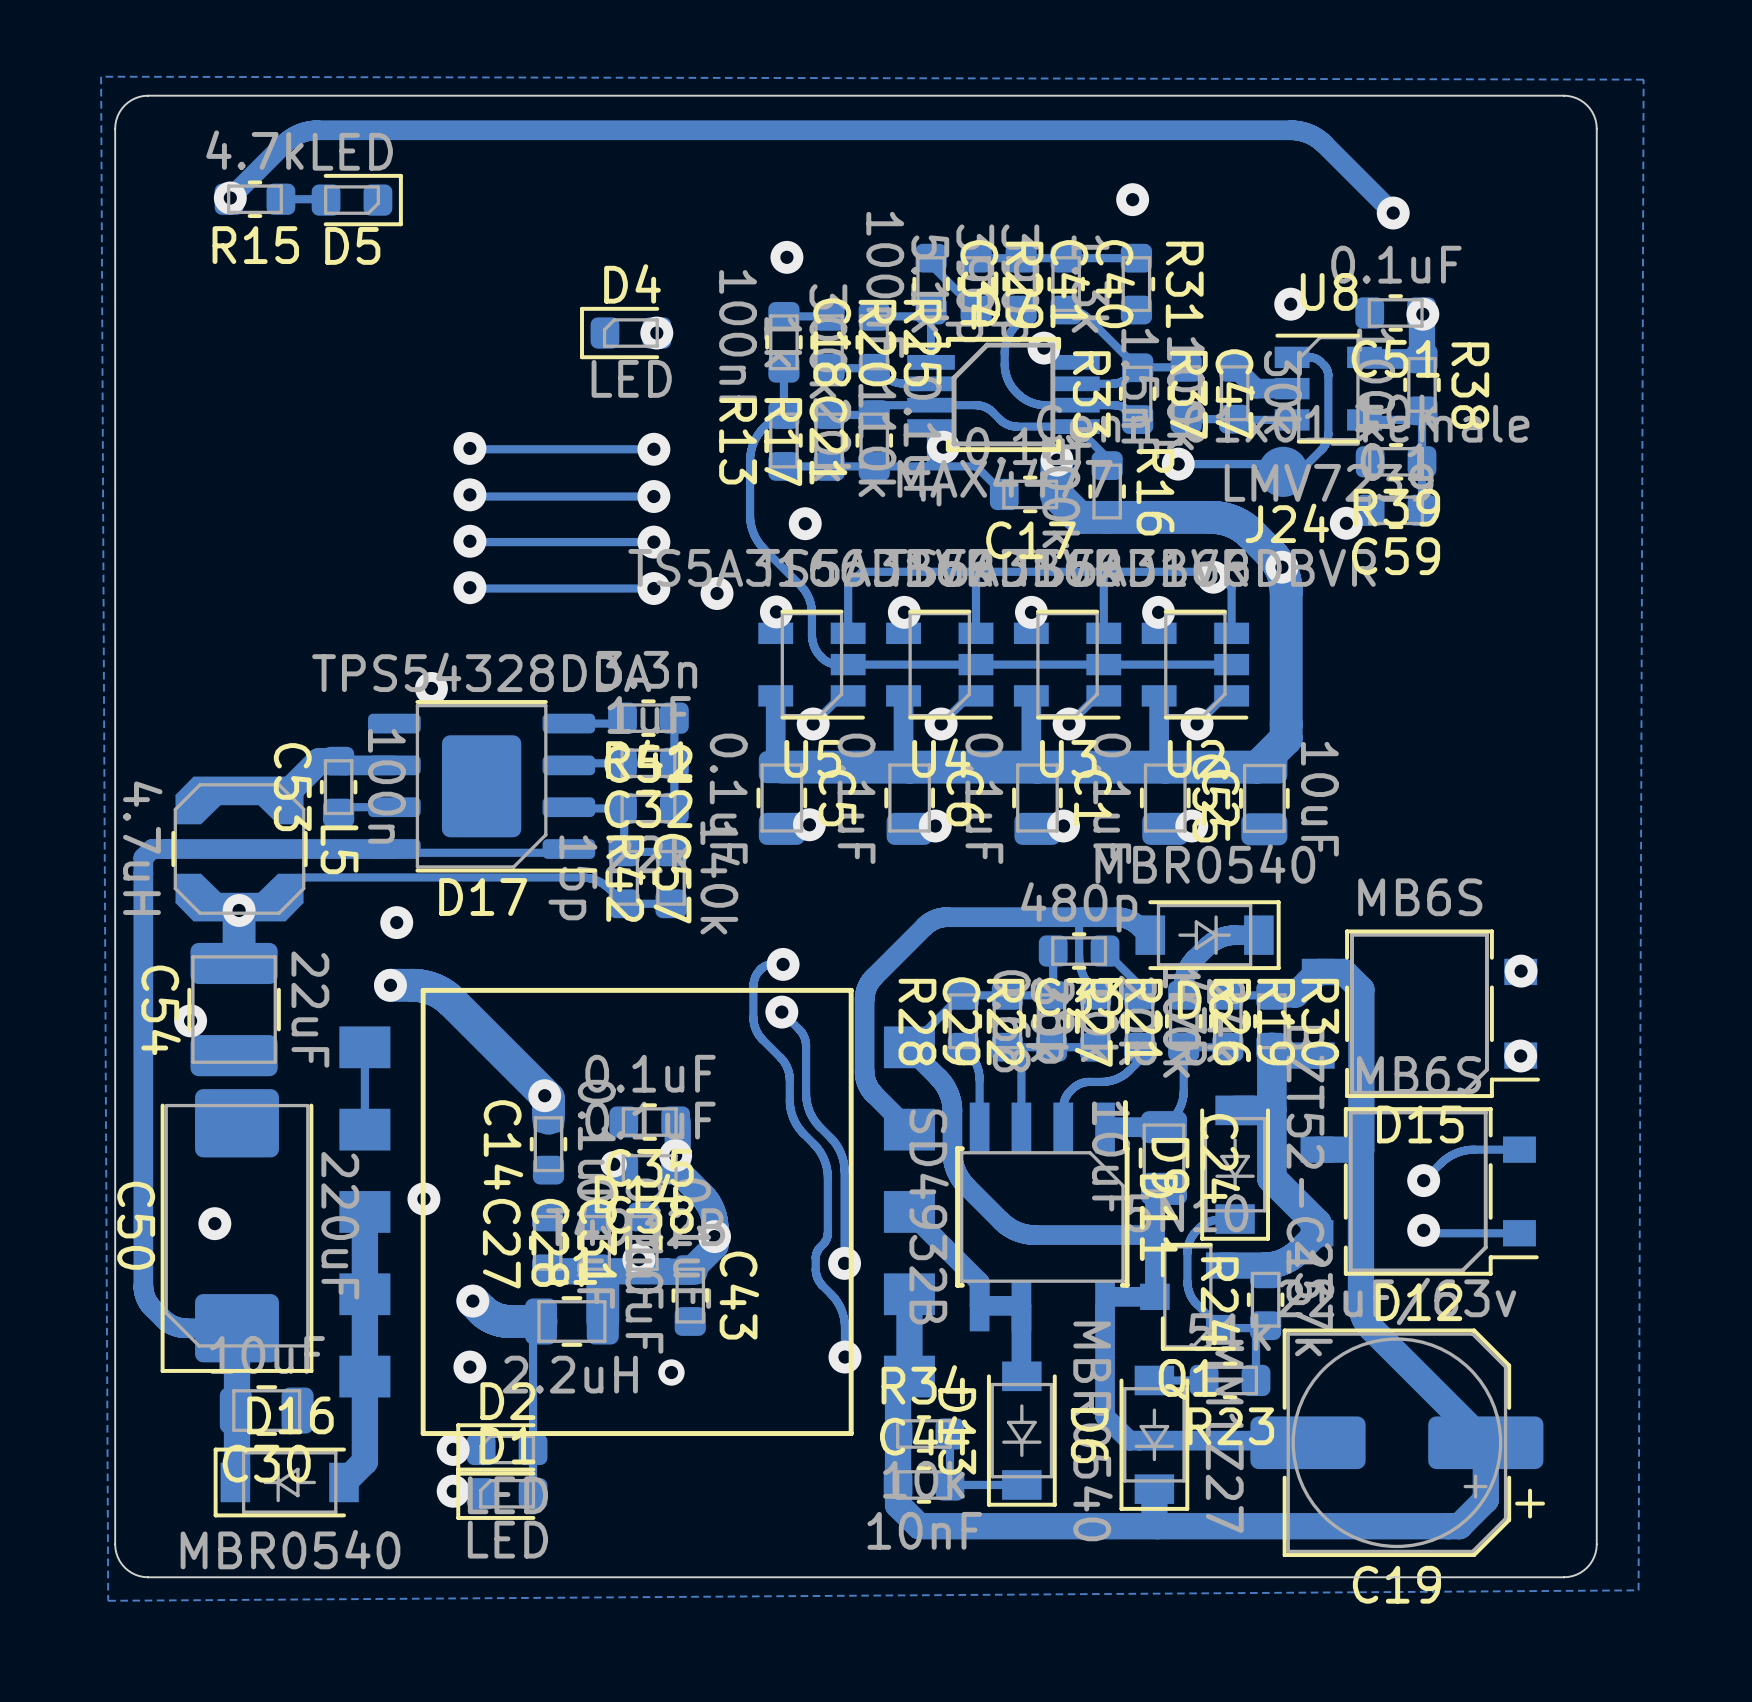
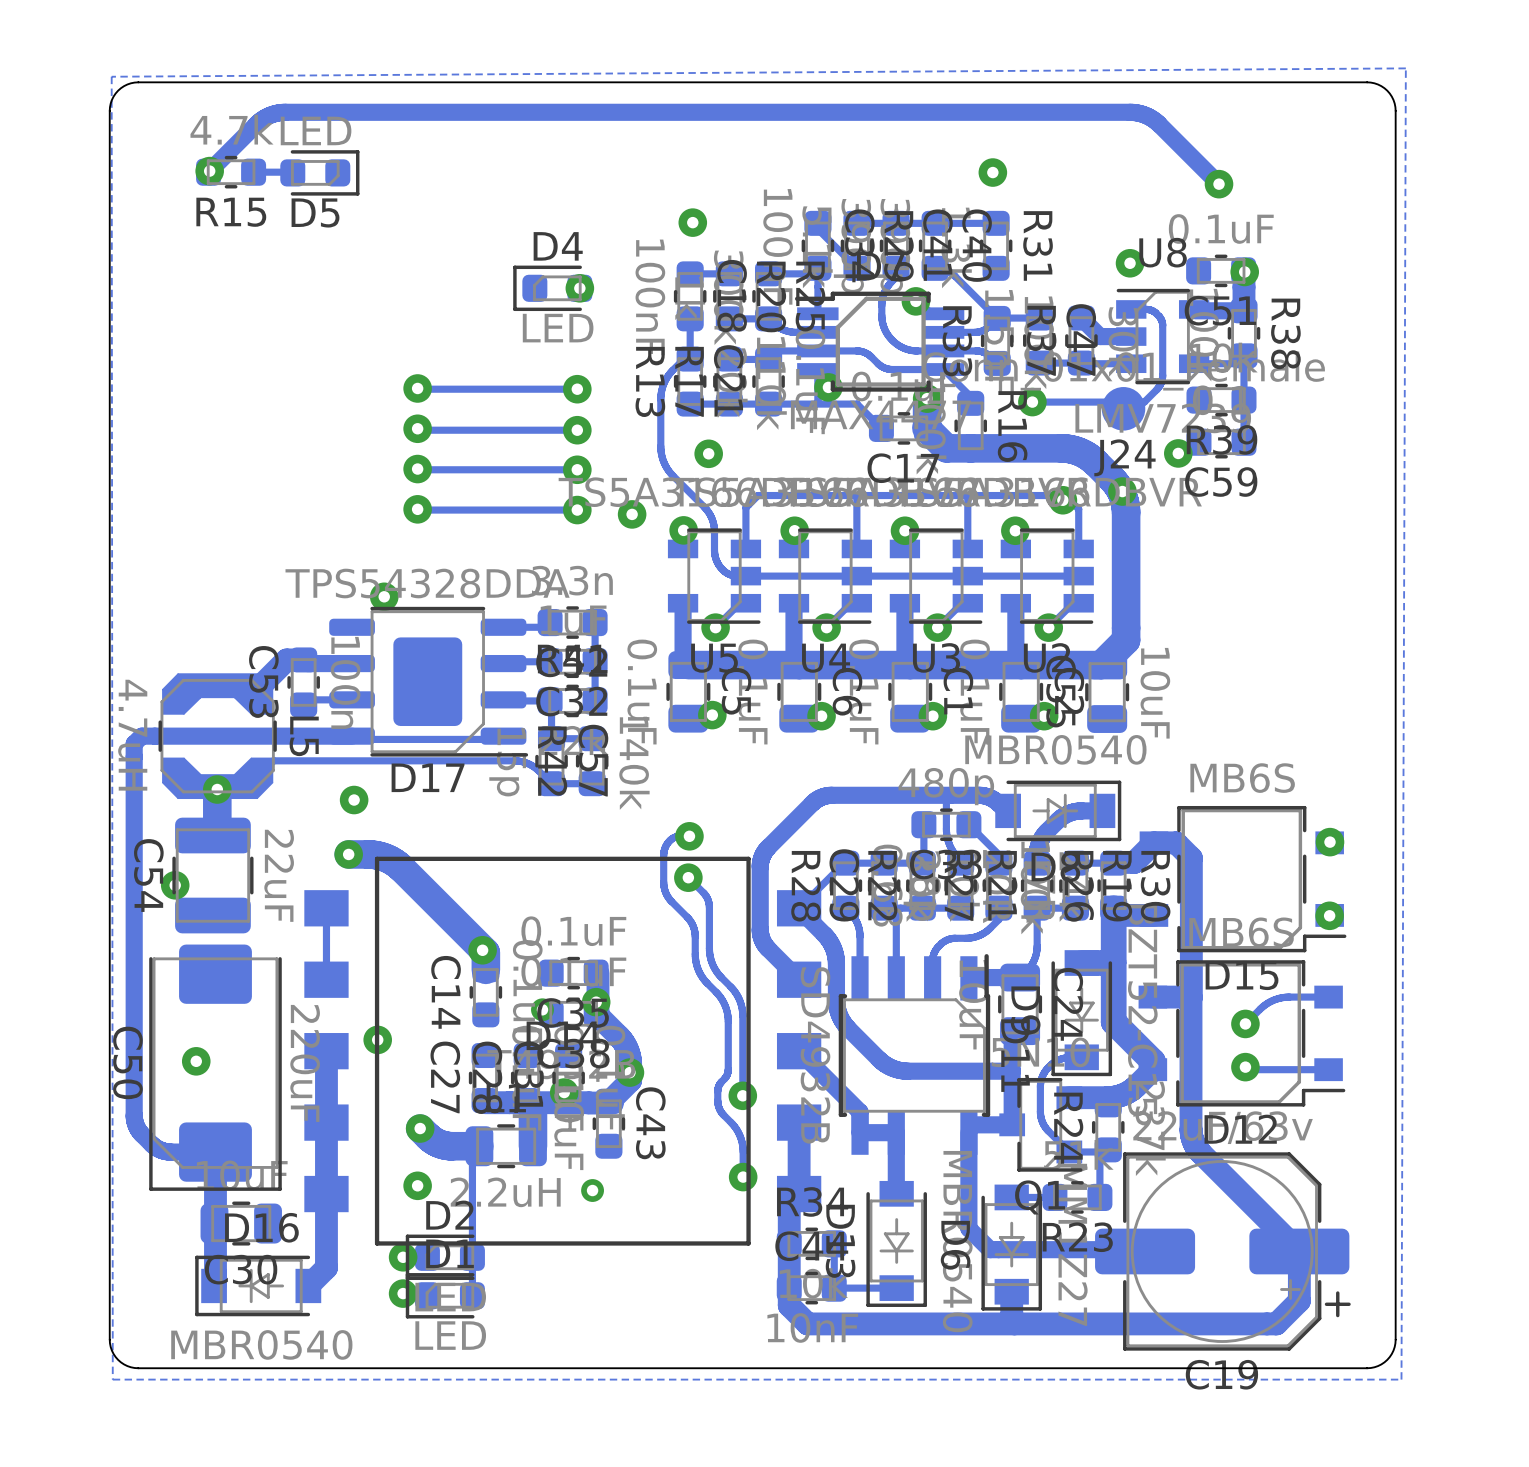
zone outline: (101, 76) (1643, 79) (1638, 1590) (108, 1600) (101, 76) -> (1405, 68) (1401, 1379) (112, 1379) (111, 76) (1405, 68)

